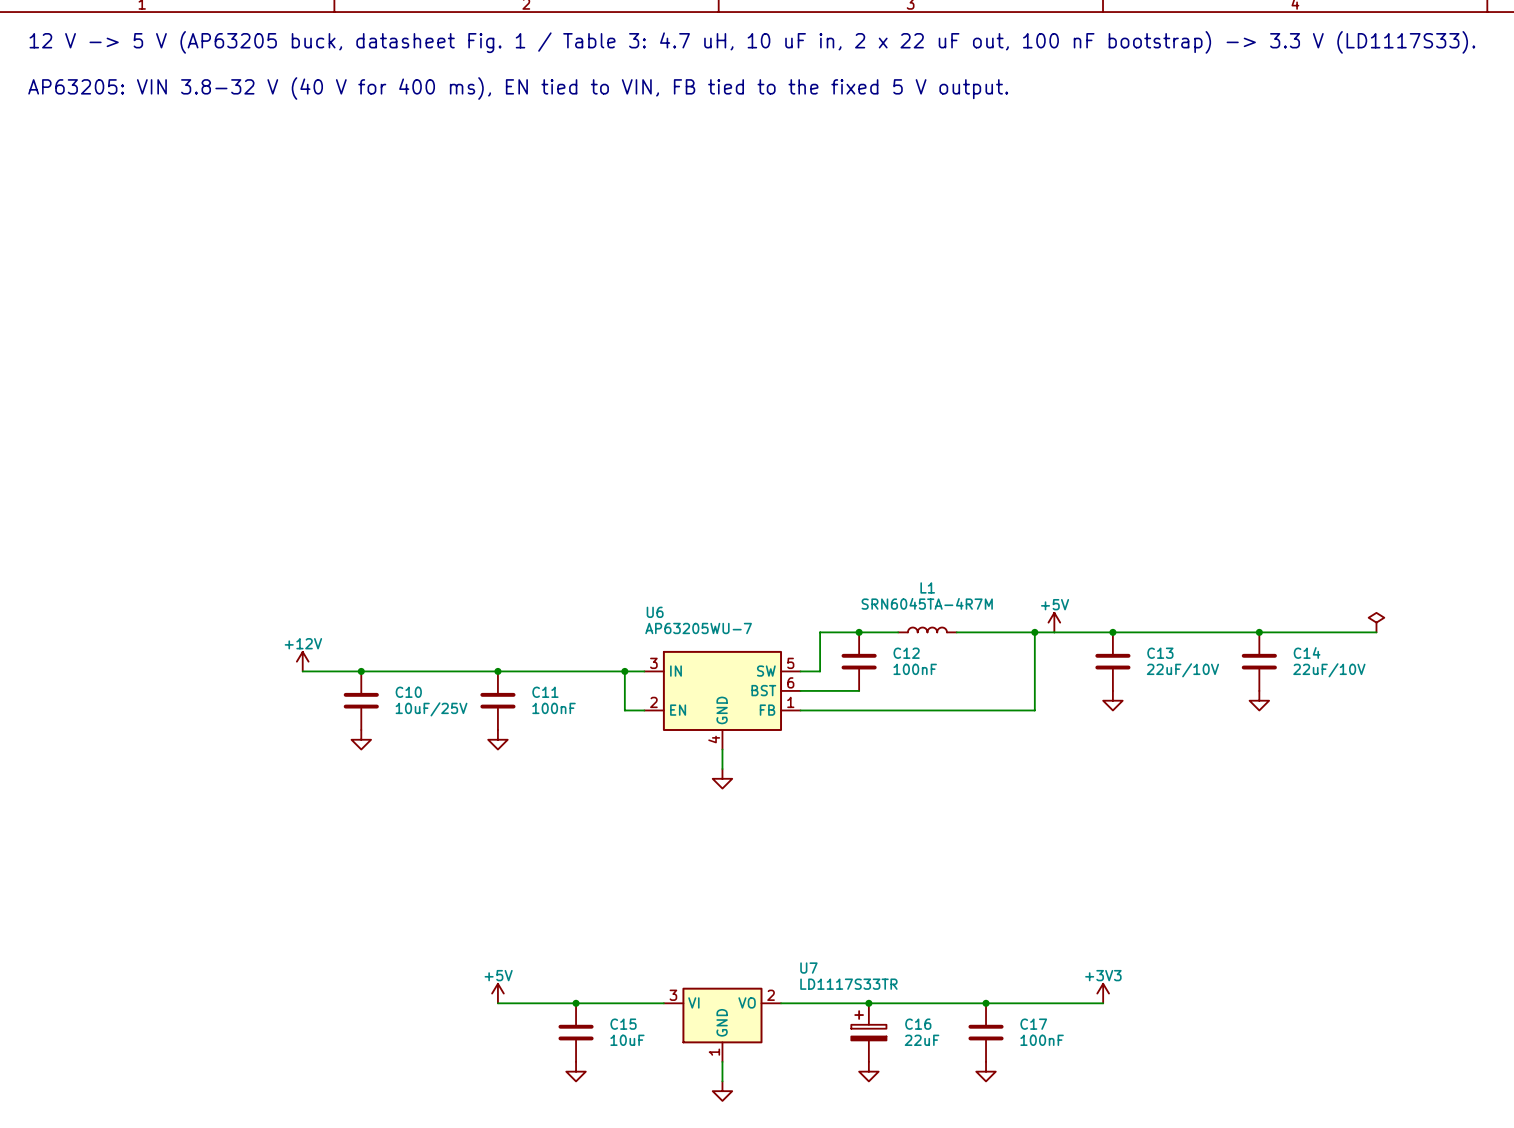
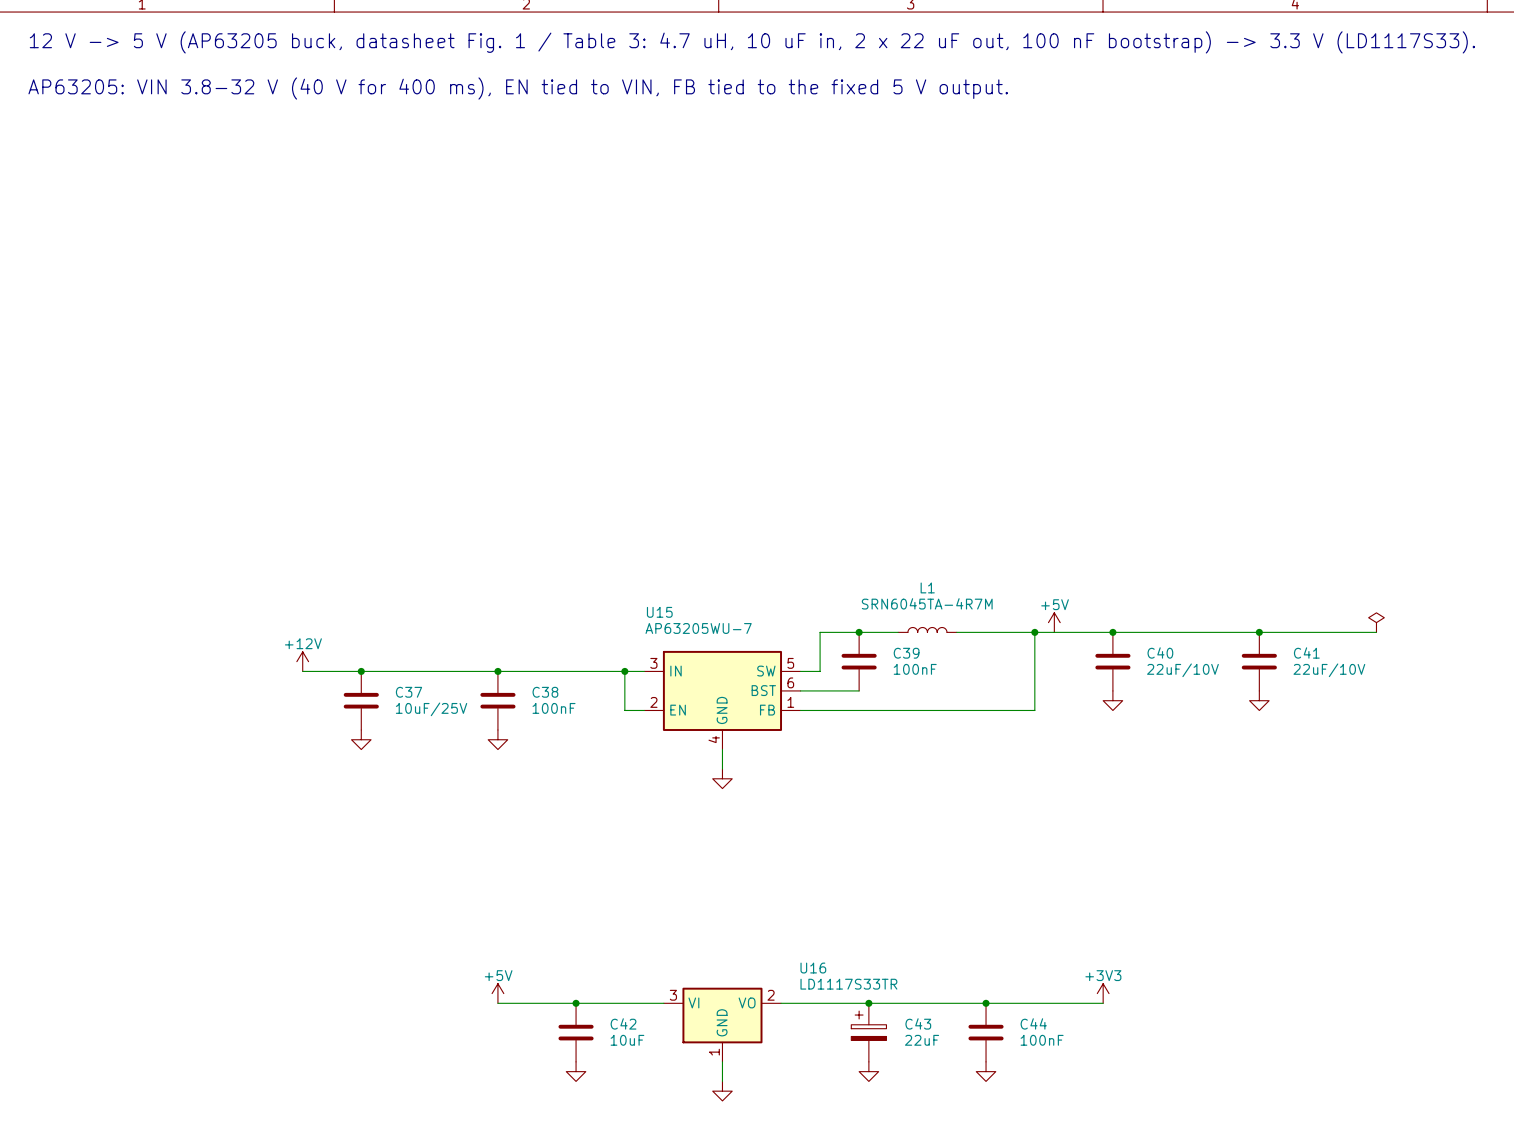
U6 name: U6 (655, 612) -> U15 (659, 612)
C14 name: C14 (1307, 652) -> C41 (1306, 652)
C12 name: C12 (906, 653) -> C39 (906, 653)
C13 name: C13 (1160, 653) -> C40 (1160, 652)
C10 name: C10 (408, 692) -> C37 (409, 692)
C11 name: C11 (545, 692) -> C38 (545, 692)
U7 name: U7 (808, 968) -> U16 (813, 968)
C15 name: C15 (623, 1024) -> C42 (623, 1023)
C16 name: C16 (918, 1024) -> C43 (918, 1023)
C17 name: C17 (1033, 1024) -> C44 (1033, 1023)

